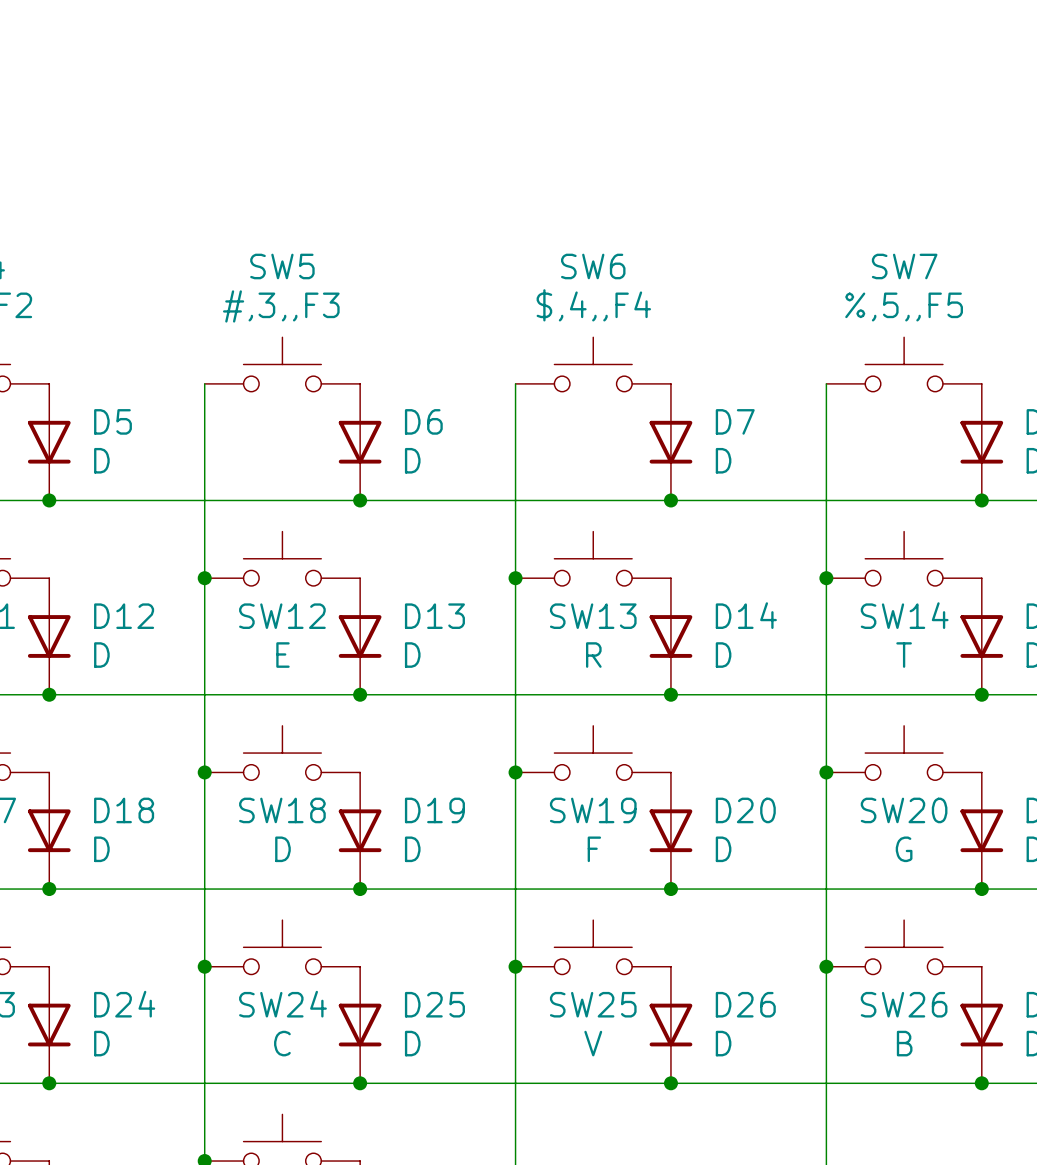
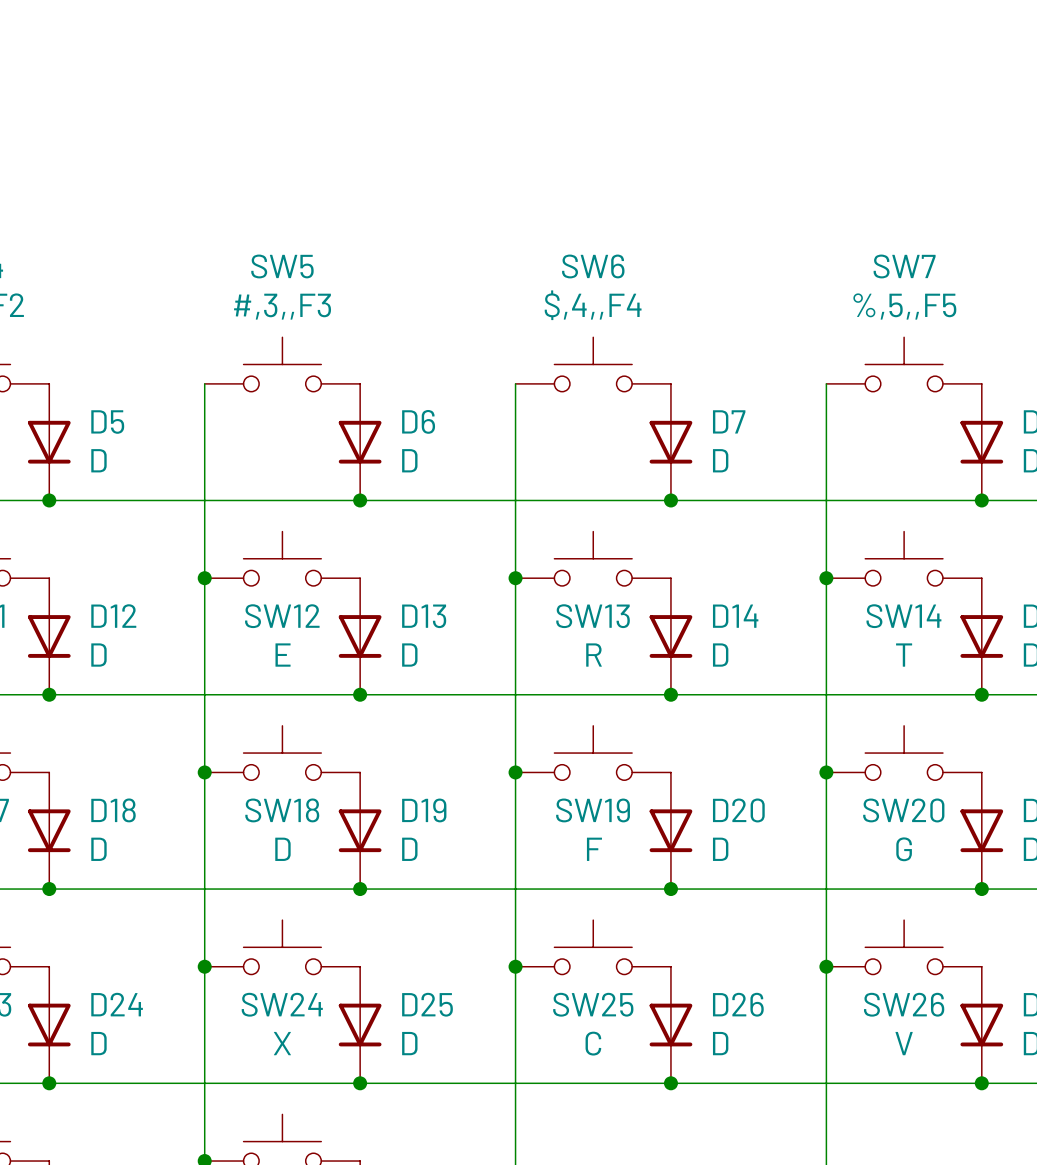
SW24 value: C (282, 1043) -> X (282, 1043)
SW25 value: V (593, 1043) -> C (593, 1043)
SW26 value: B (904, 1043) -> V (904, 1043)

